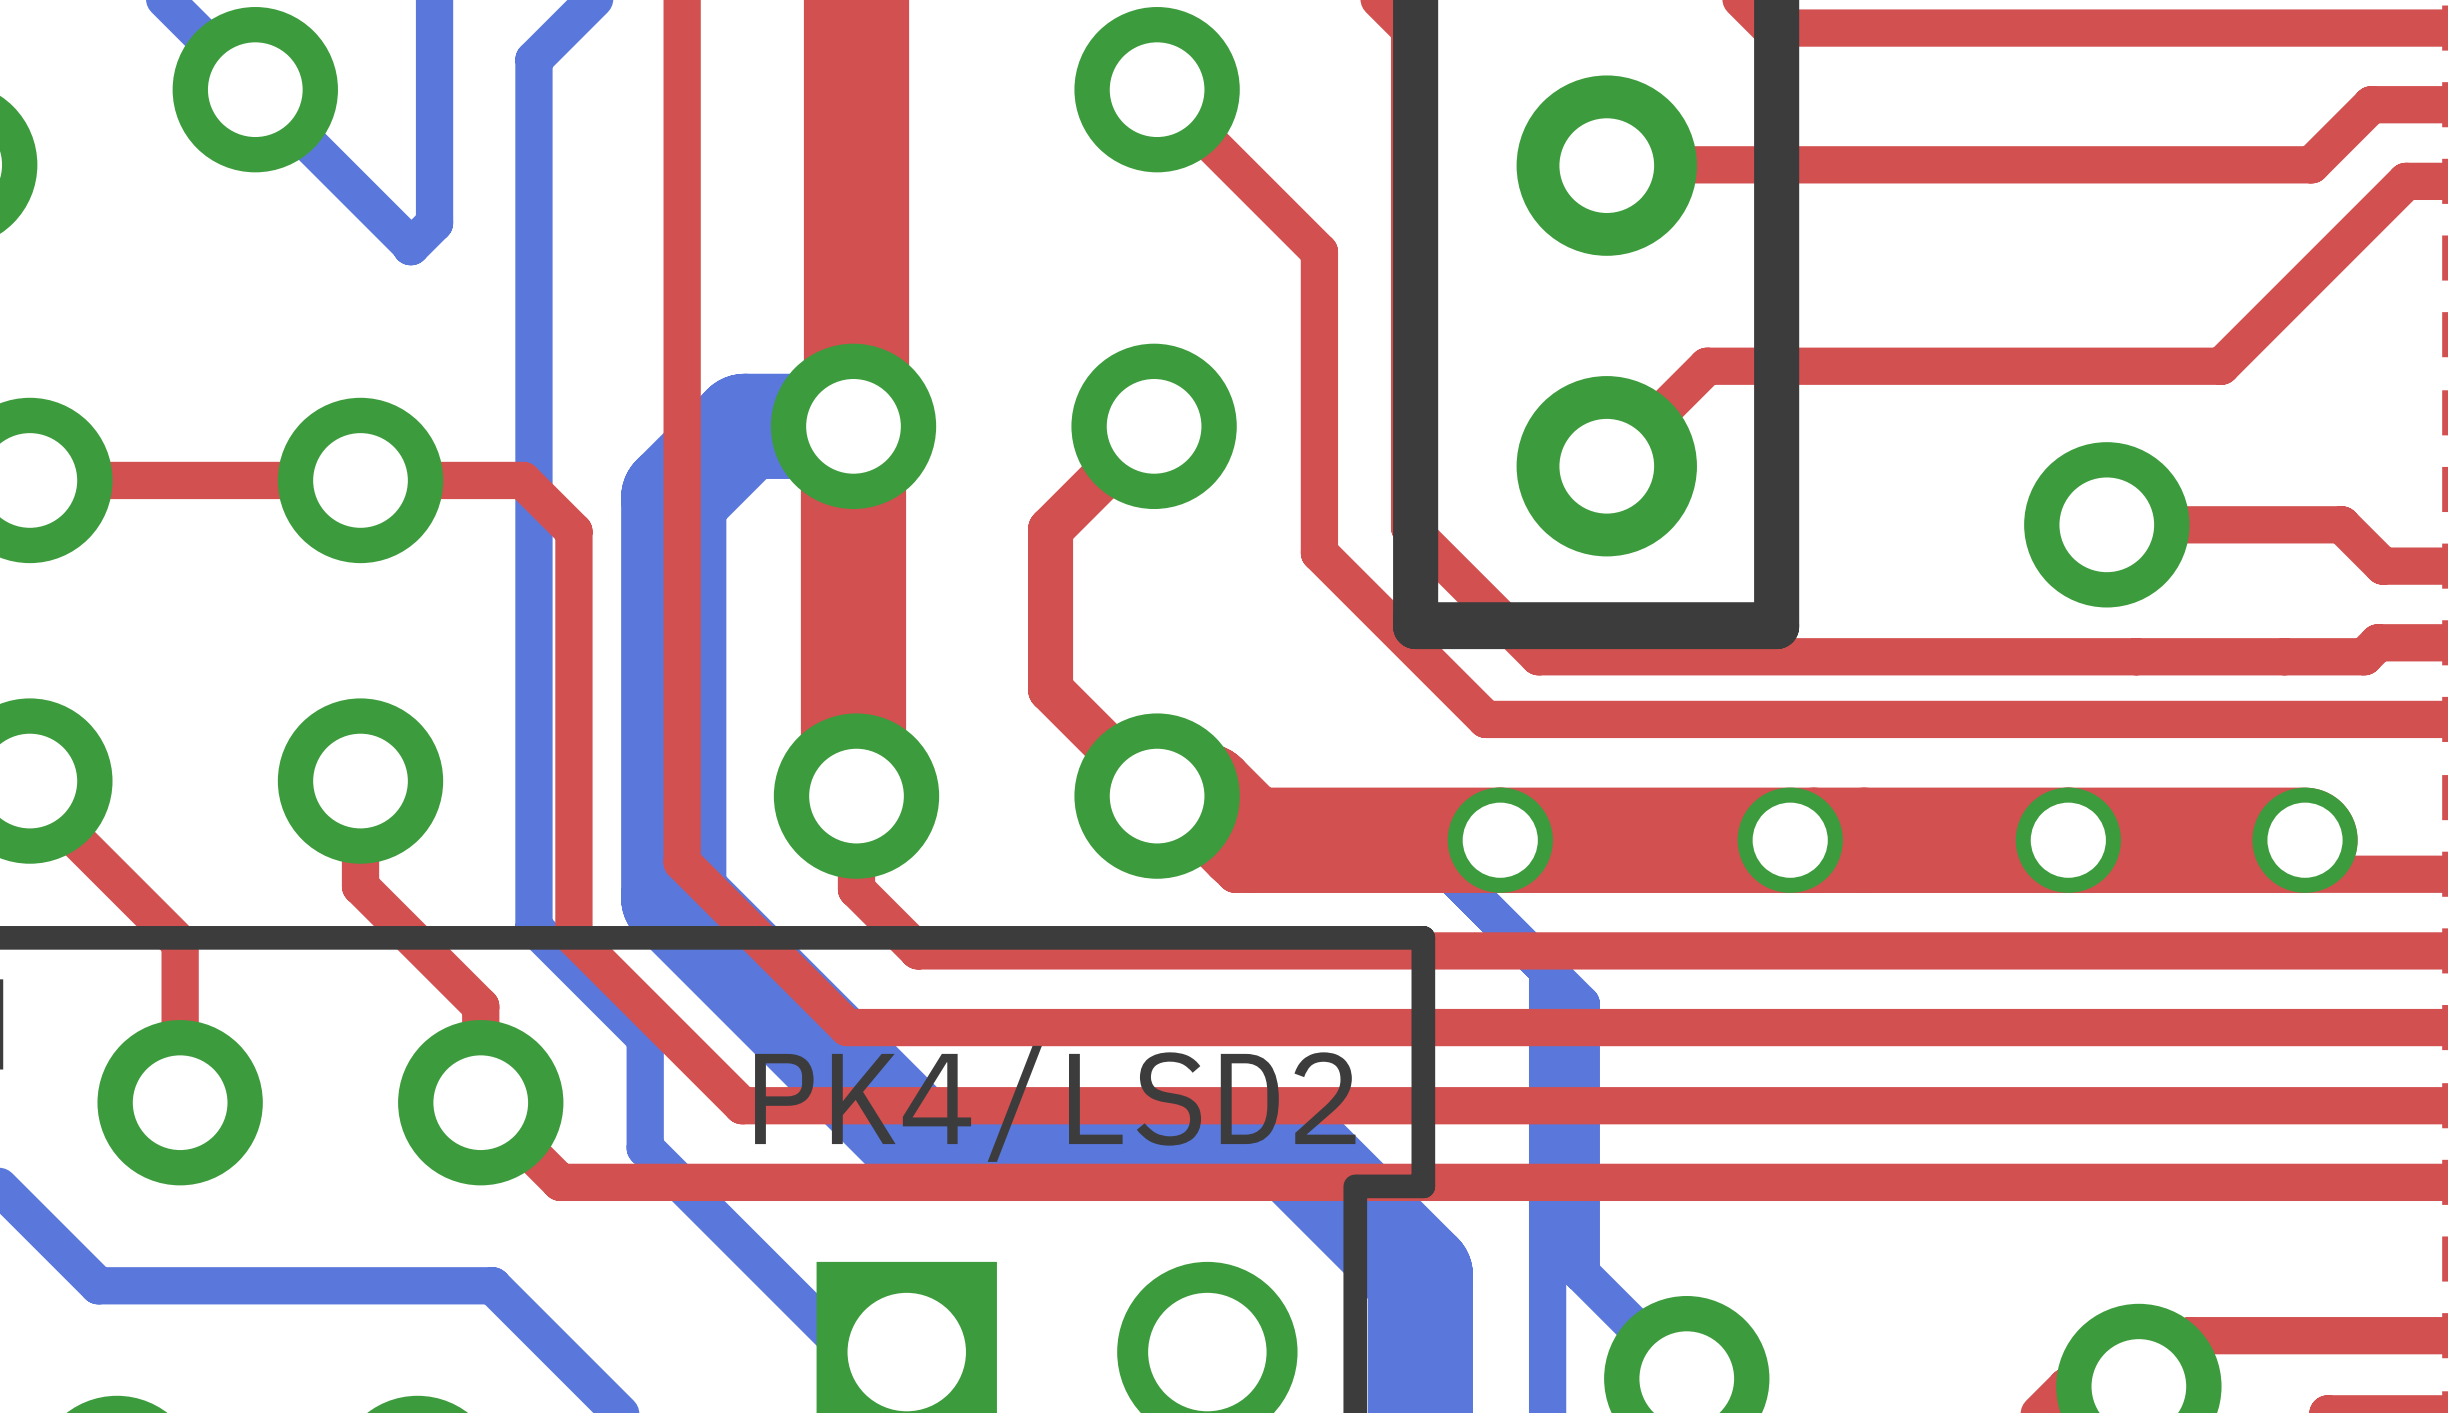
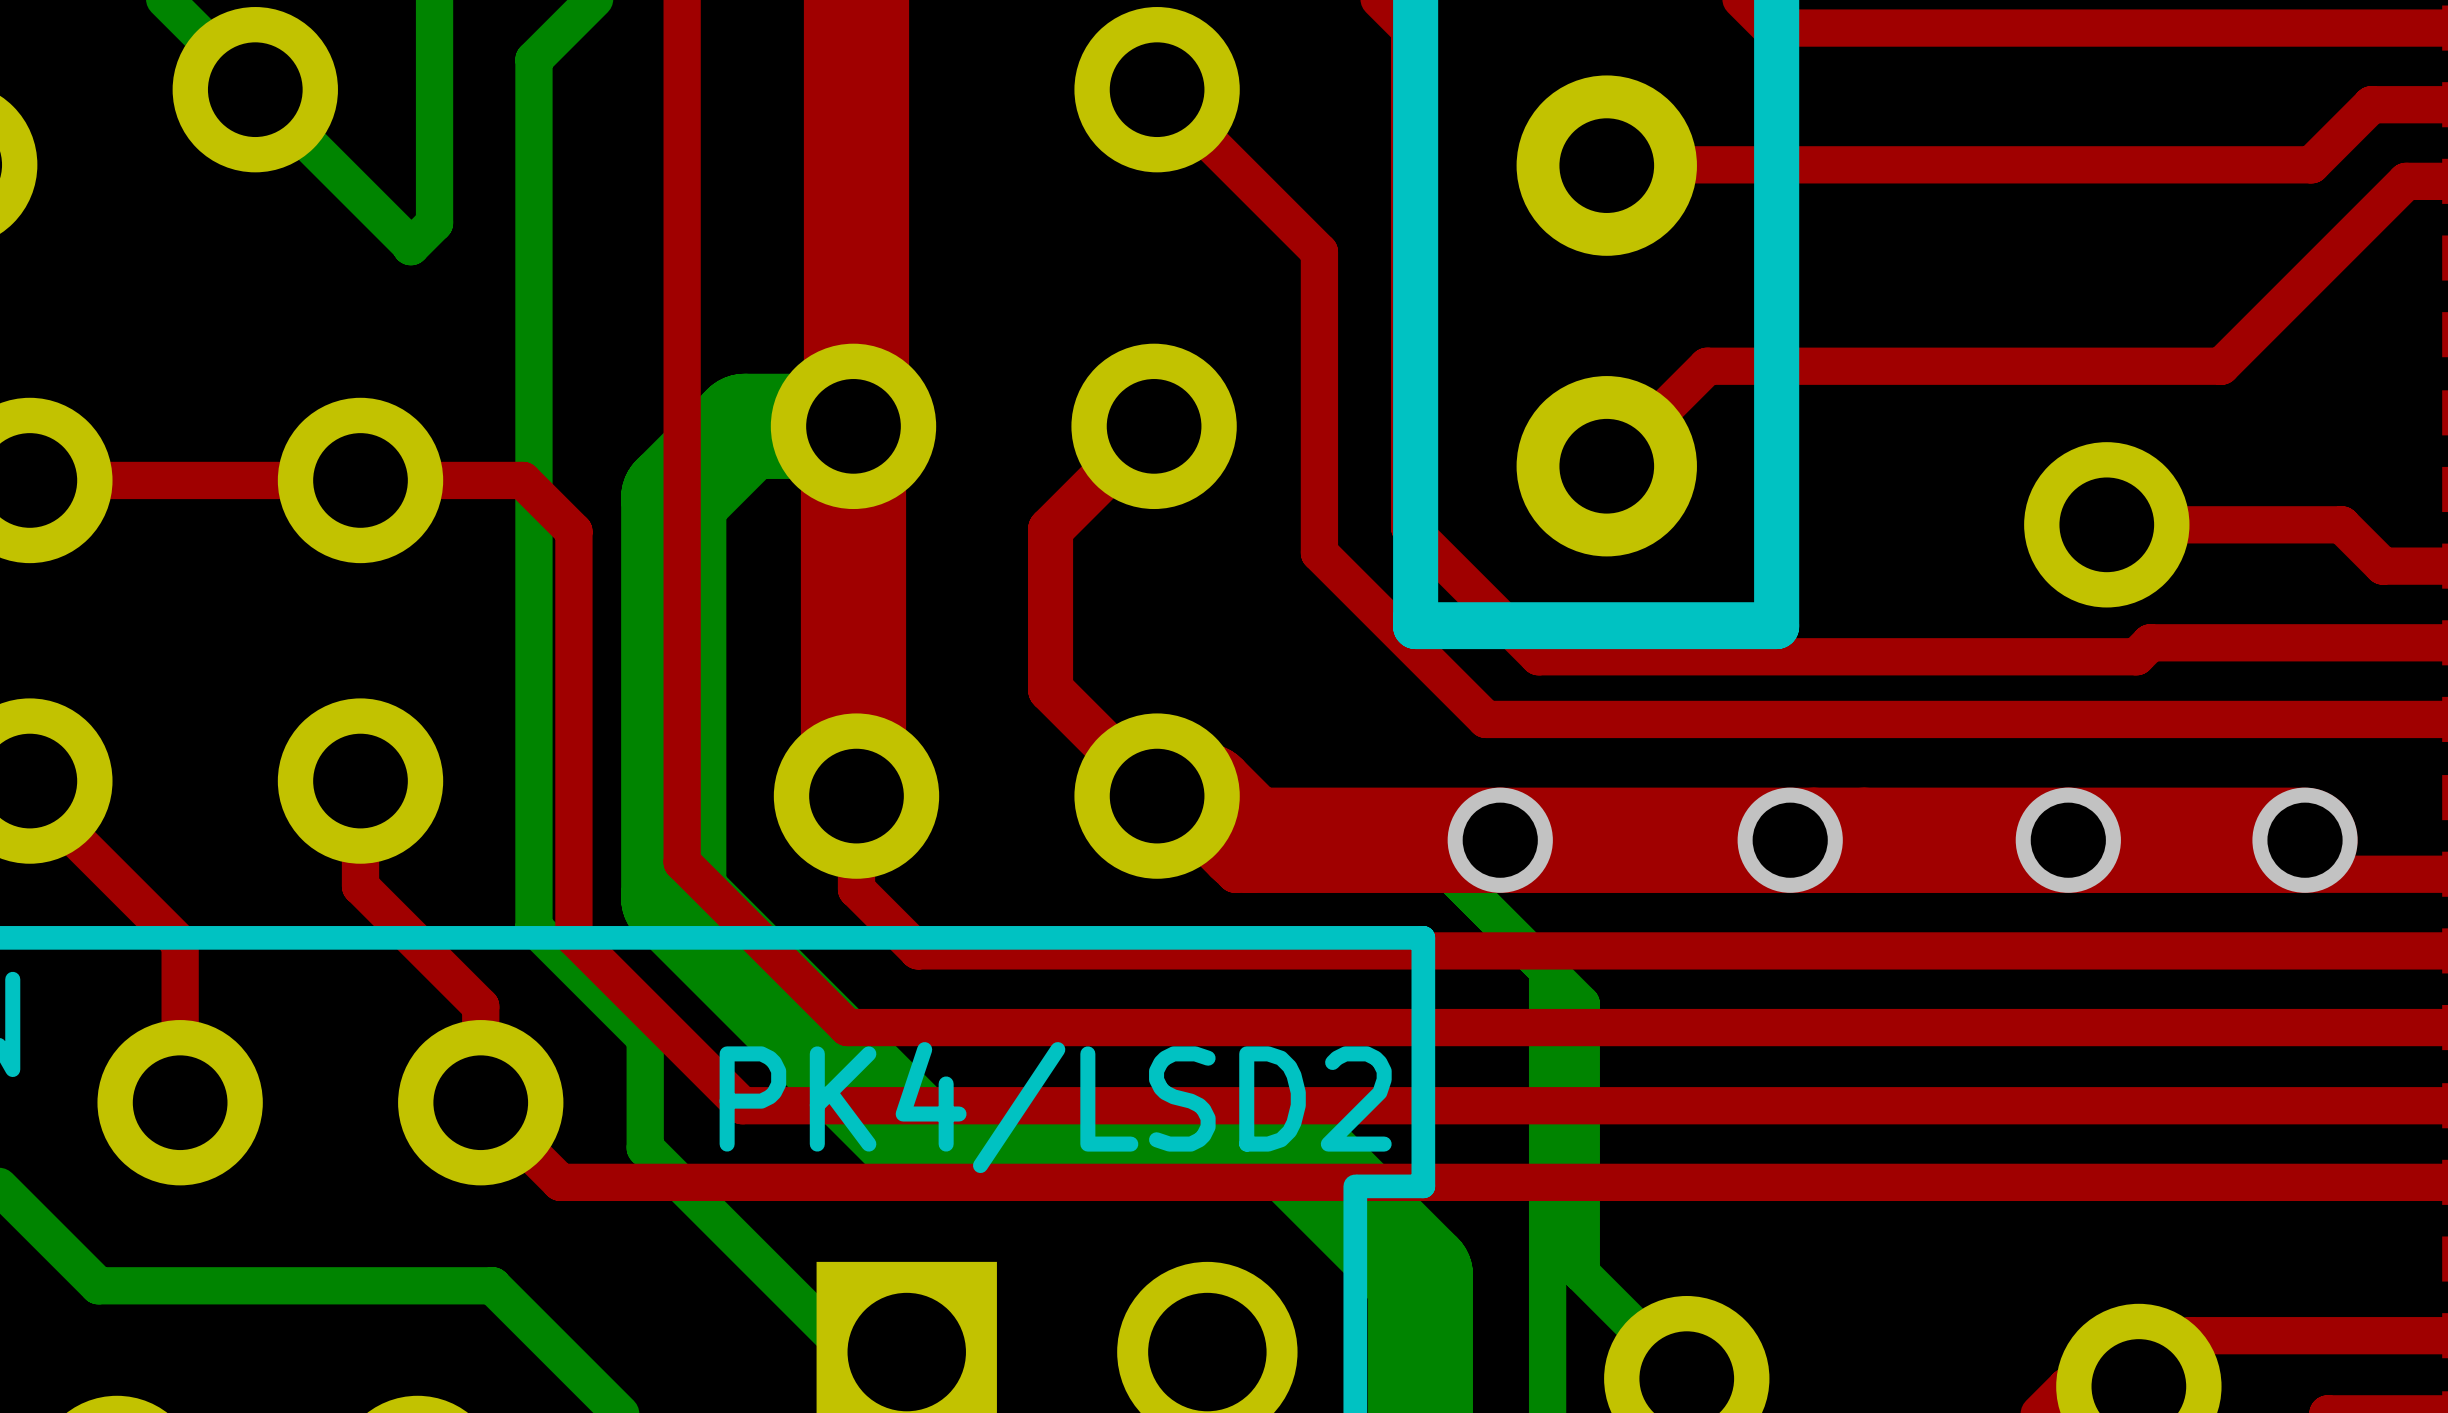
top track: (2378, 642) (2364, 656) (2136, 656) -> (2378, 642) (2150, 642) (2136, 656)

